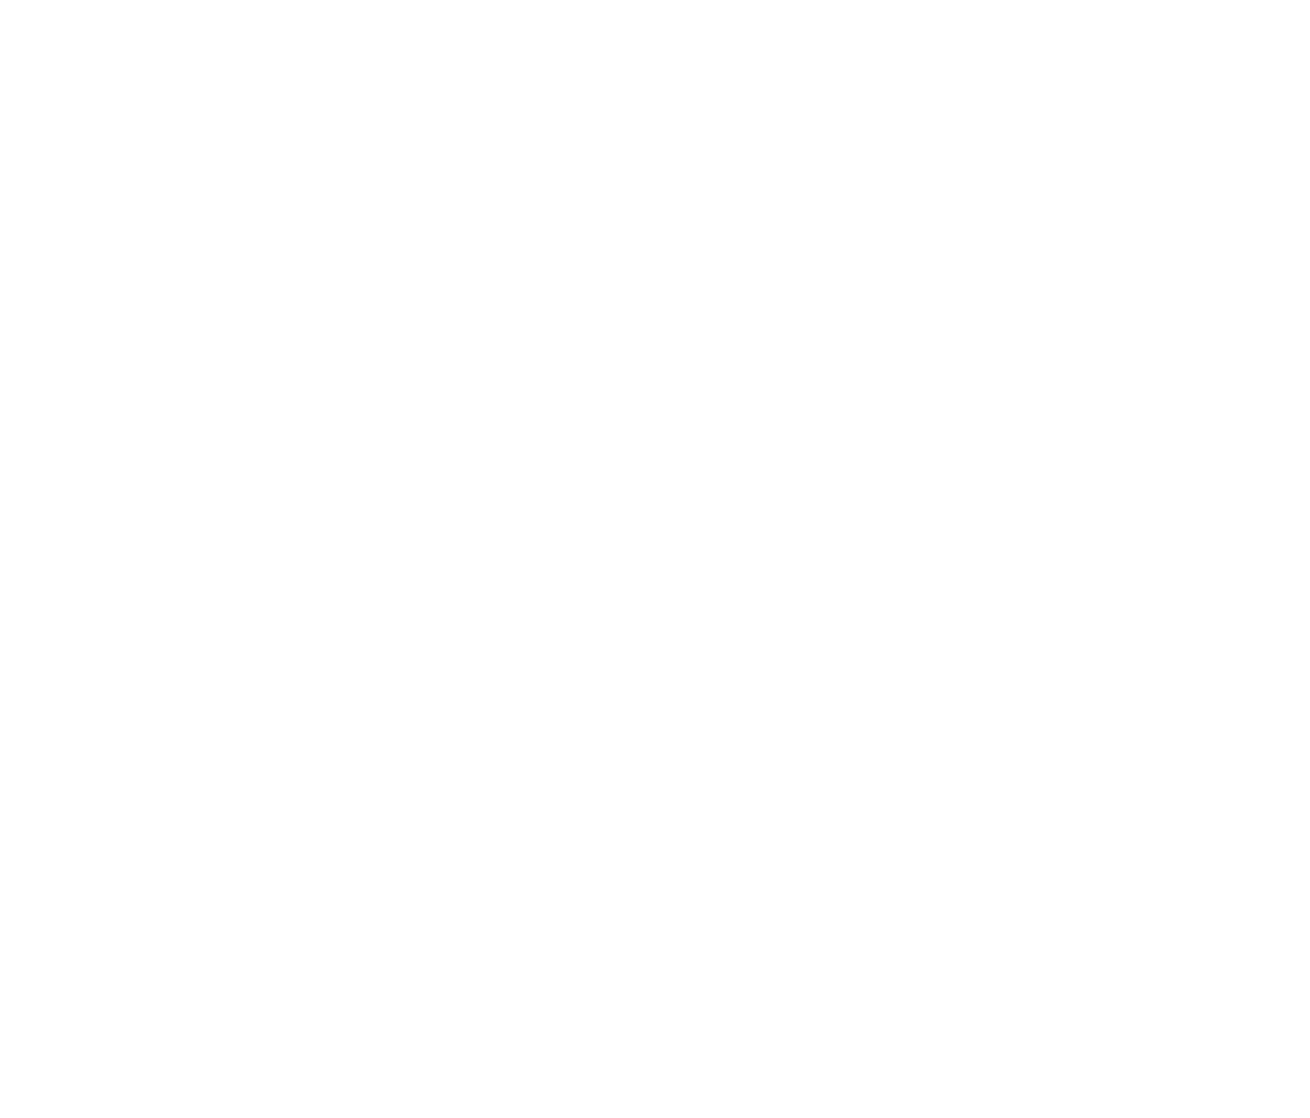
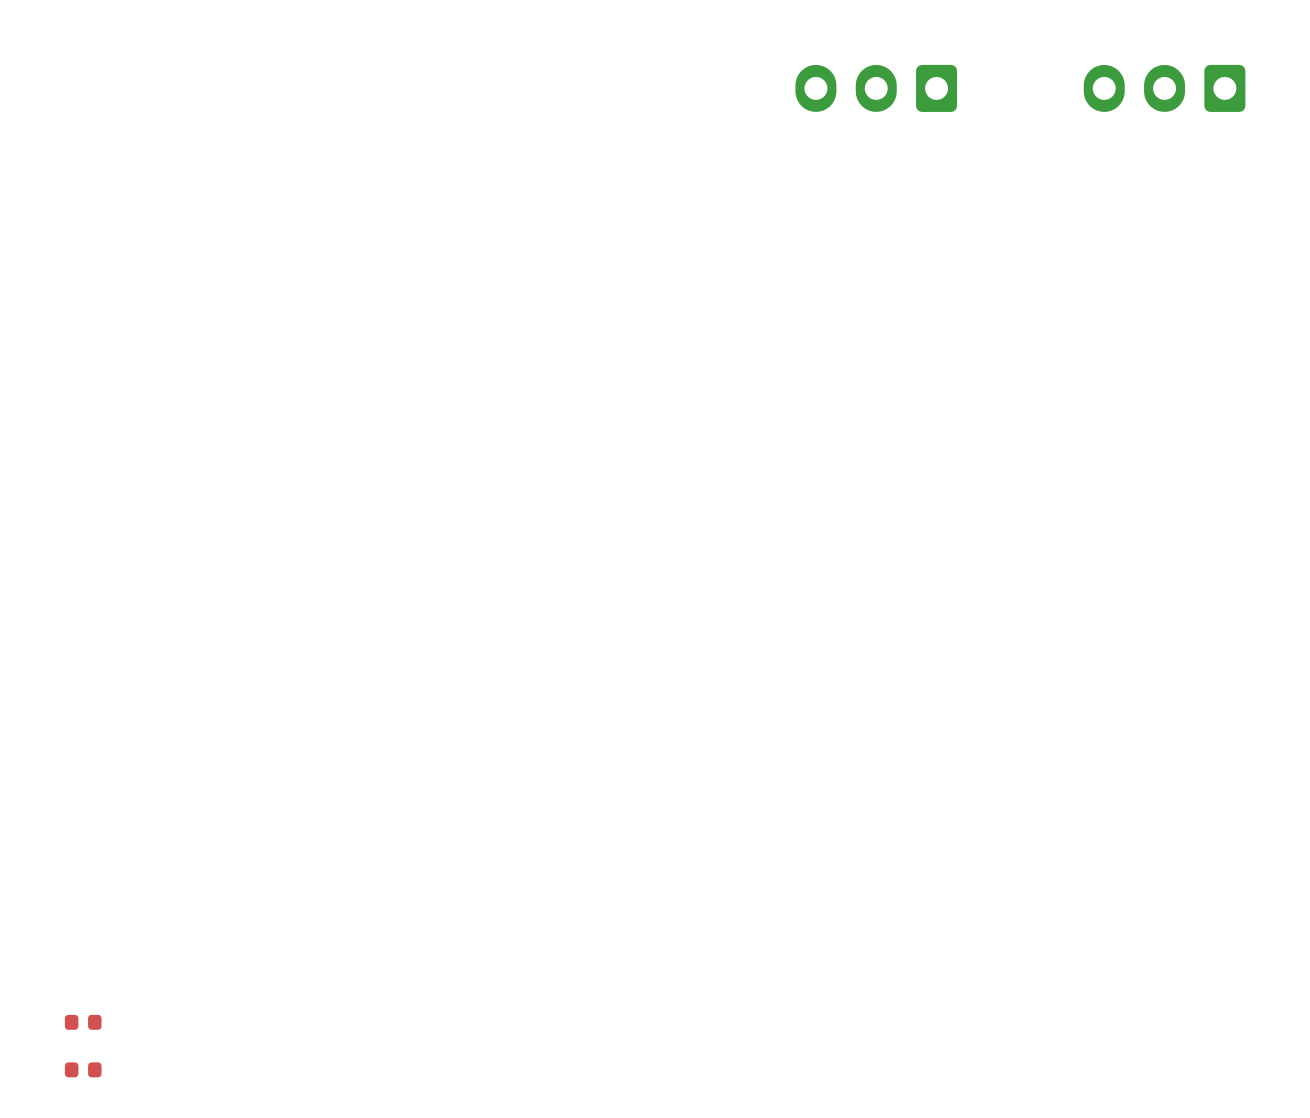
part: none -> (876, 88)
part: none -> (1164, 88)
part: none -> (83, 1022)
part: none -> (83, 1069)

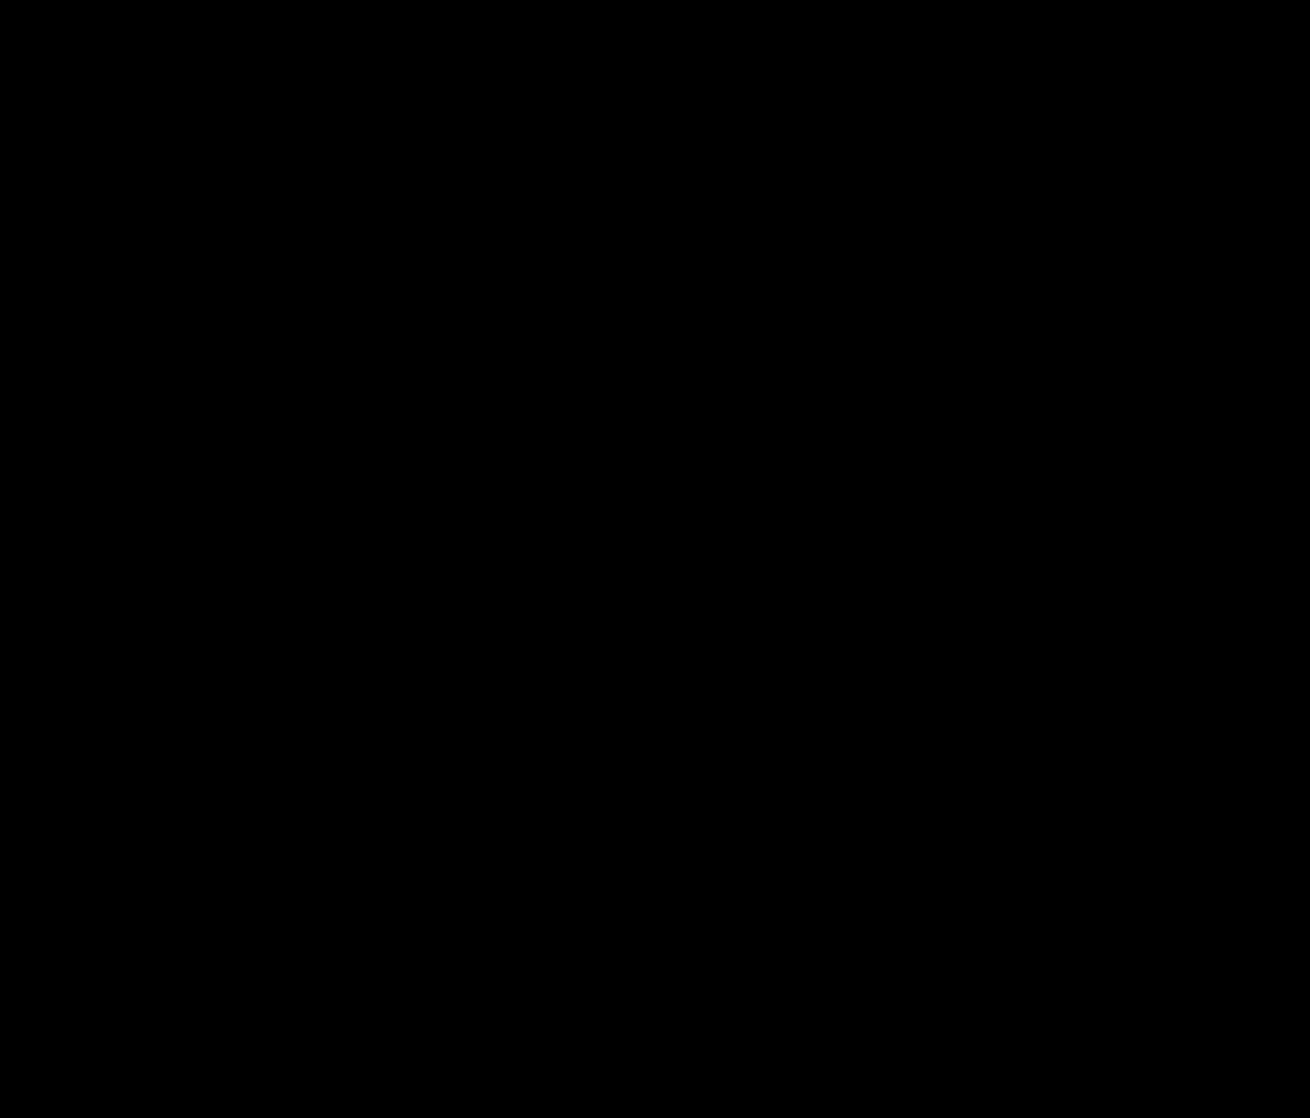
part: (876, 88) -> none
part: (1164, 88) -> none
part: (83, 1022) -> none
part: (83, 1069) -> none

